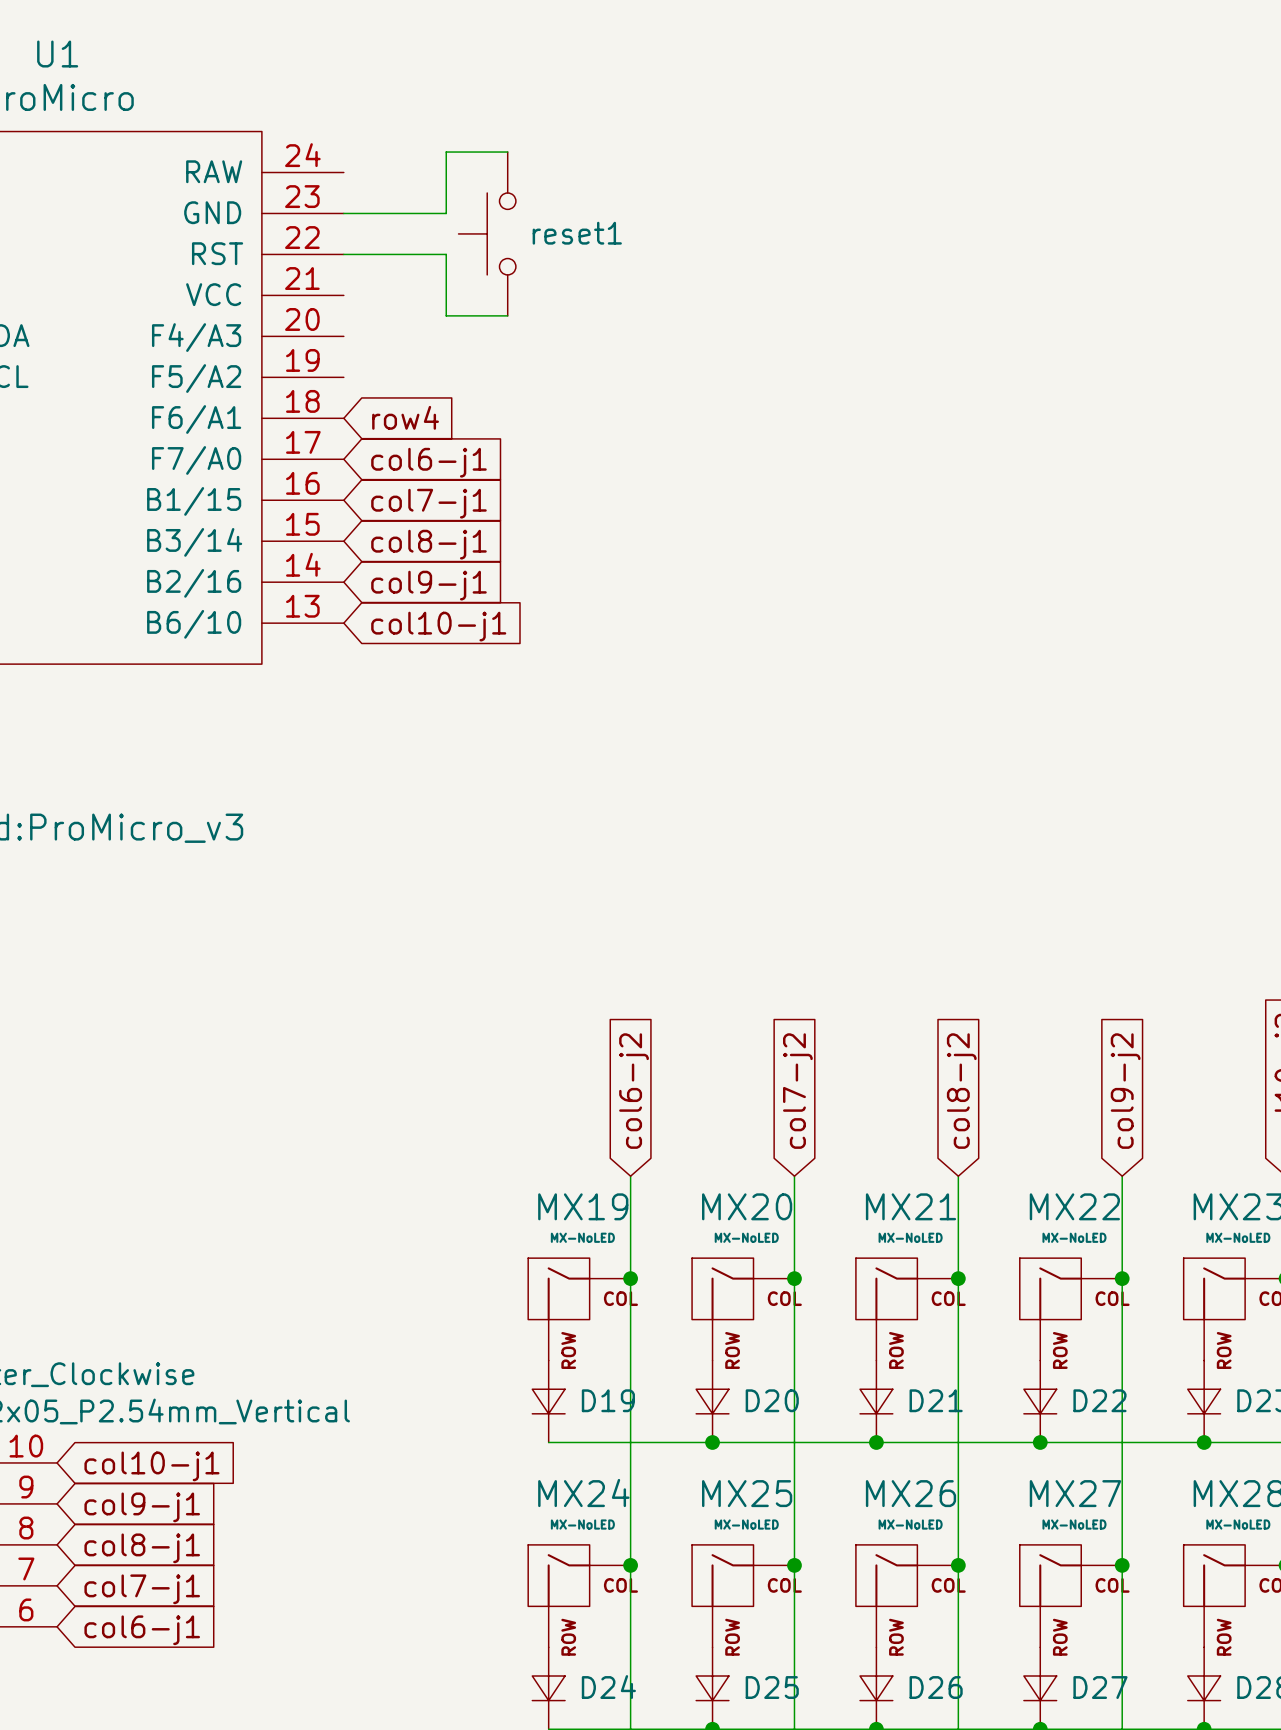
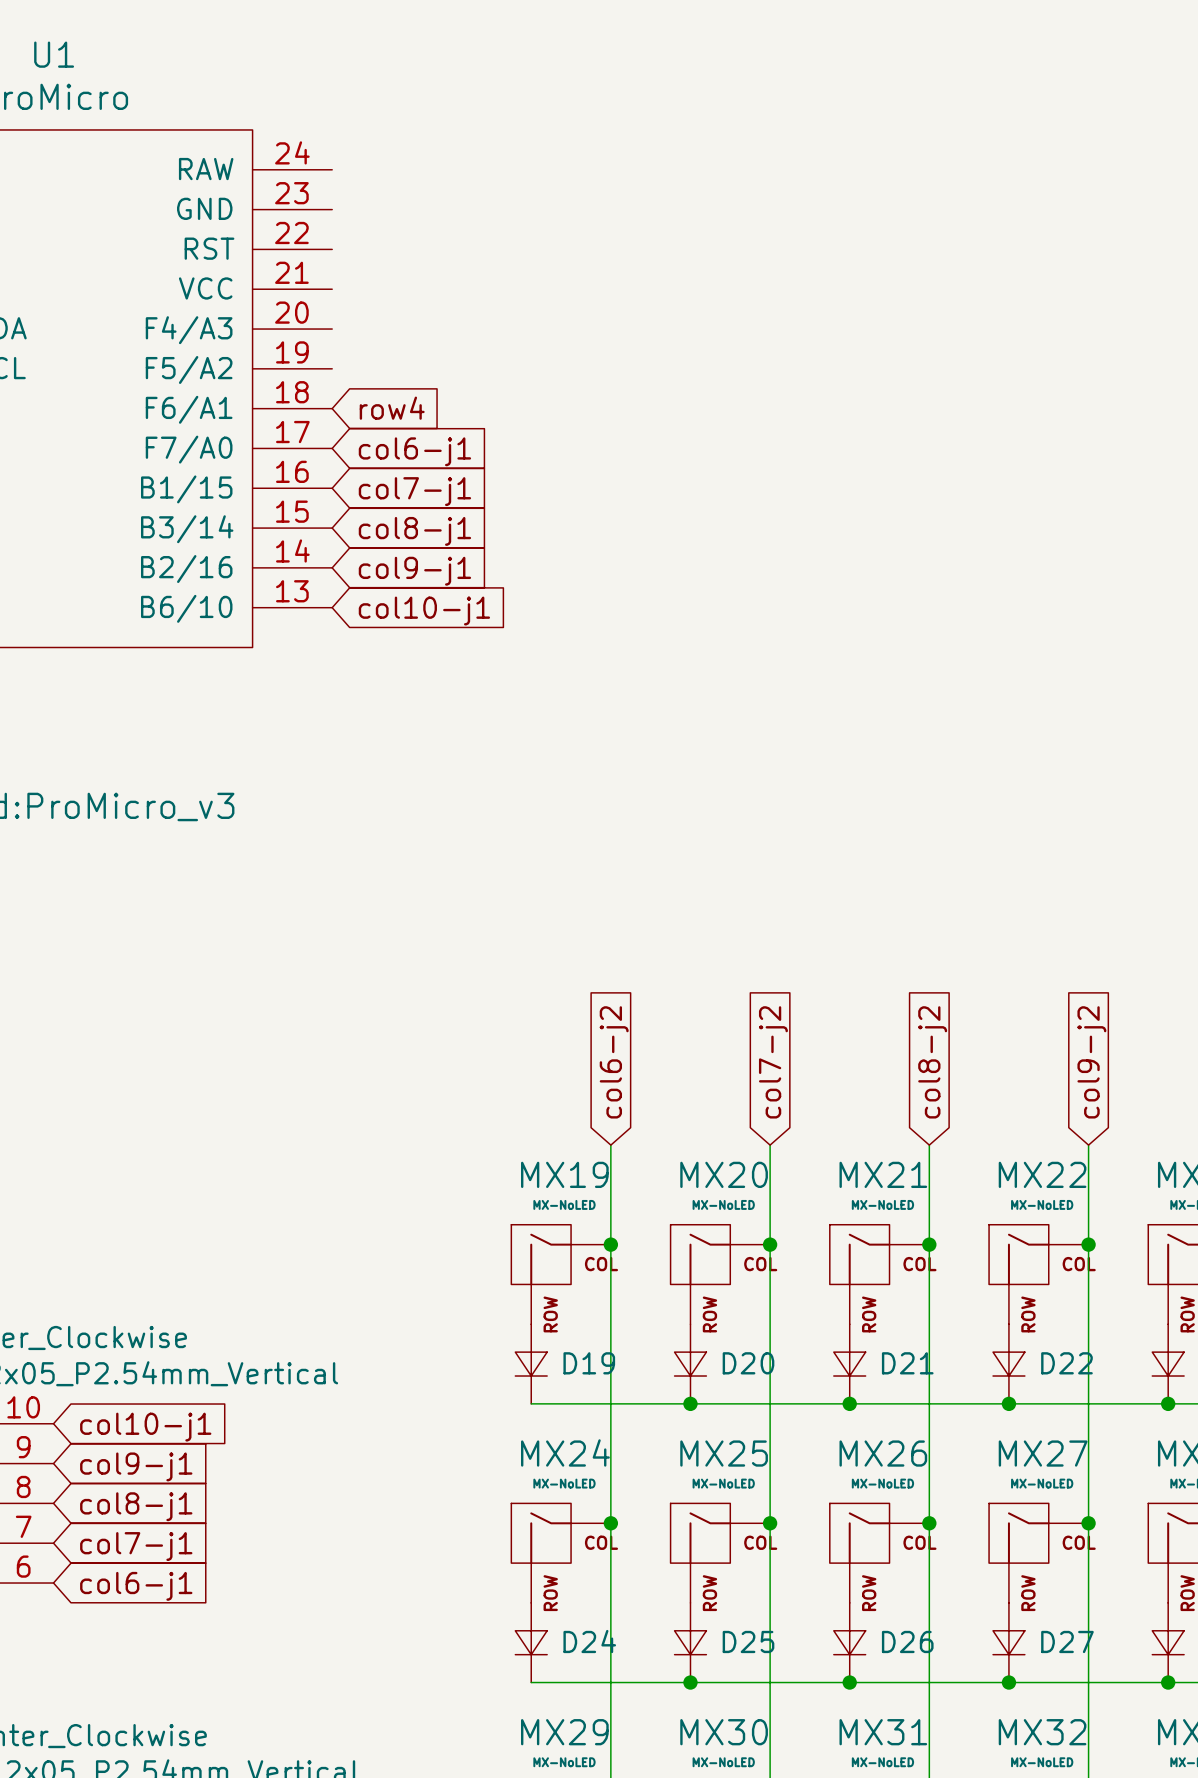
wire: (507, 152) (446, 152) (446, 213) (343, 213) -> none
reset1: (487, 233) -> none
wire: (343, 254) (446, 254) (446, 315) (507, 315) -> none

